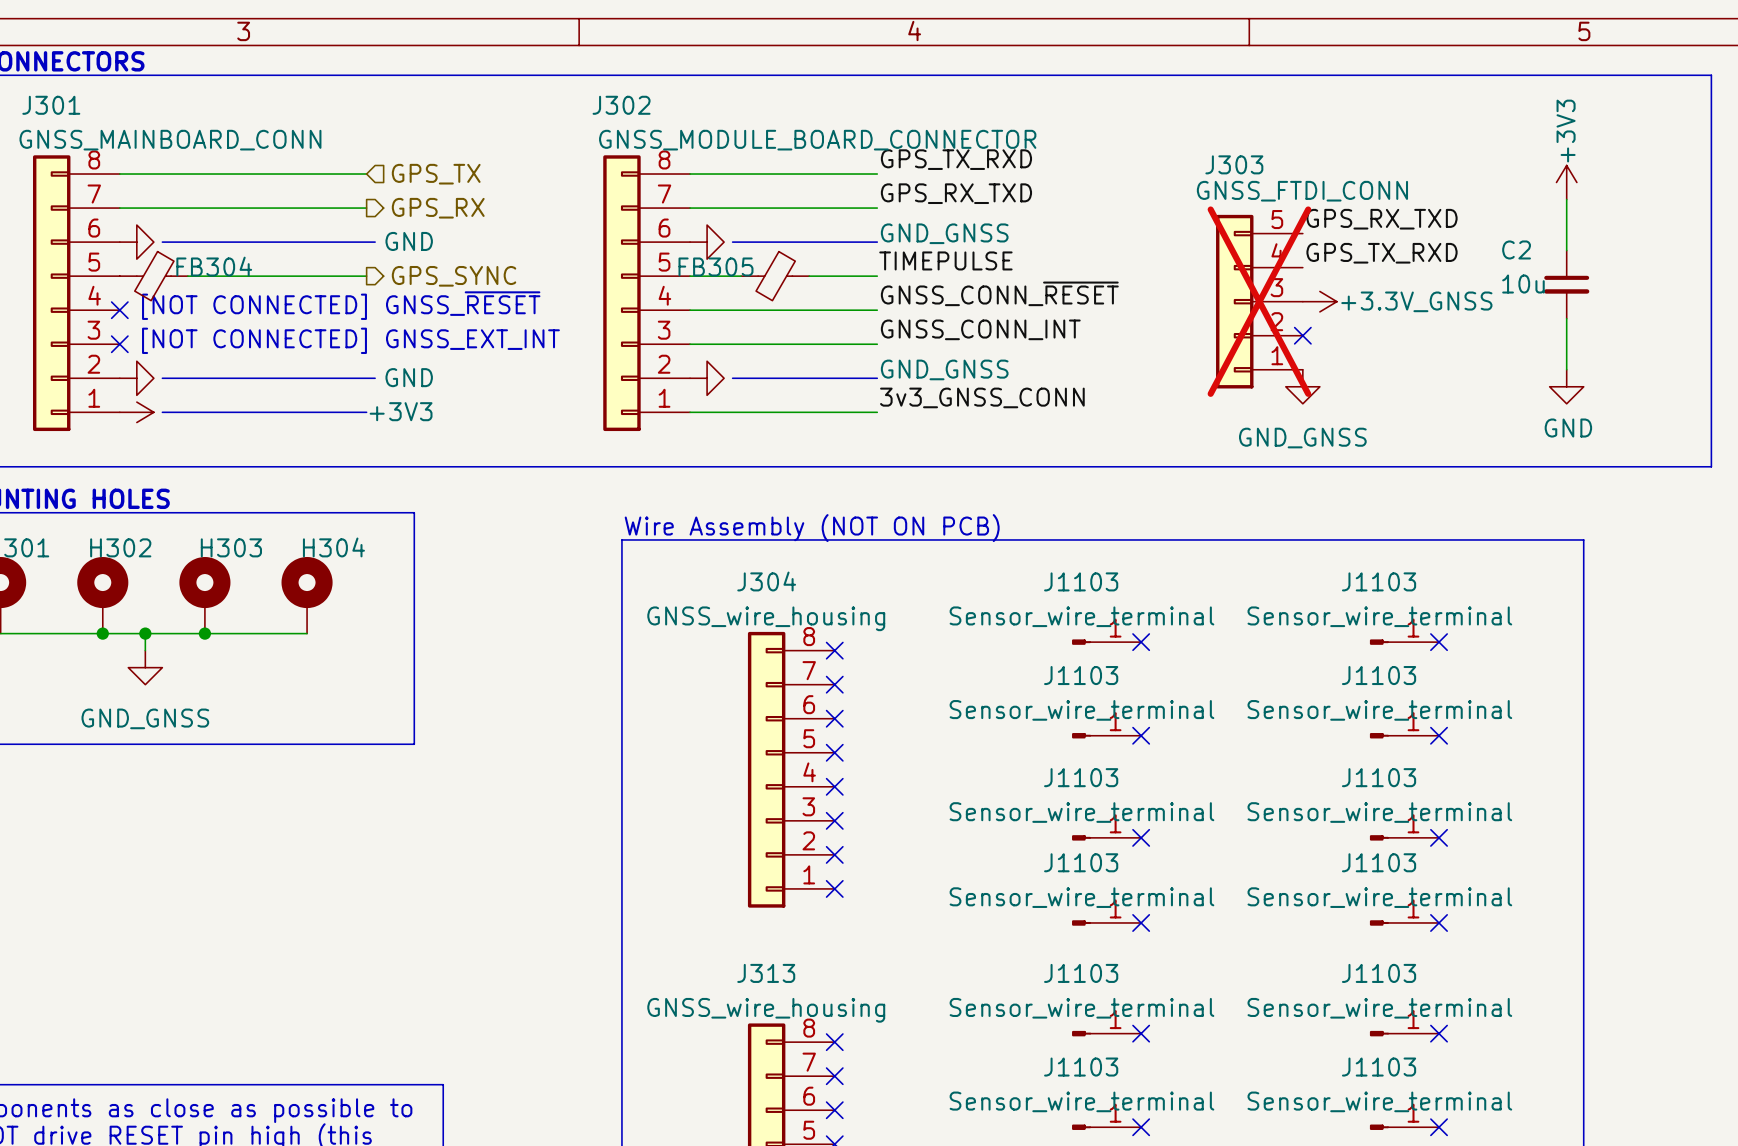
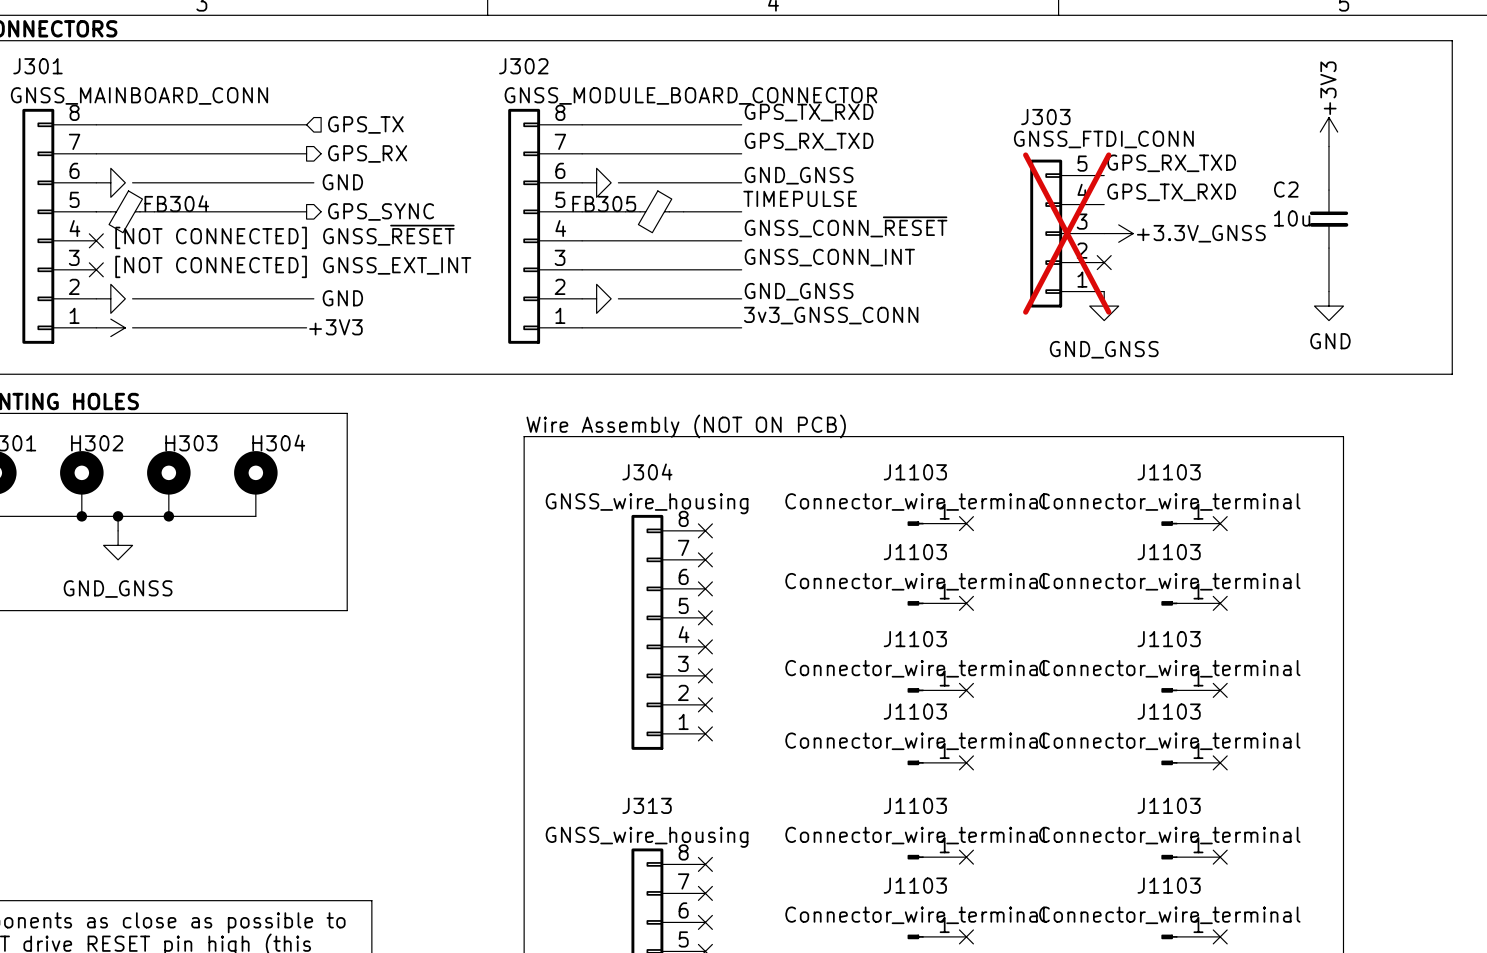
J1103 value: Sensor_wire_terminal (1081, 616) -> Connector_wire_terminal (916, 502)
J1103 value: Sensor_wire_terminal (1379, 616) -> Connector_wire_terminal (1169, 502)
J1103 value: Sensor_wire_terminal (1081, 710) -> Connector_wire_terminal (916, 581)
J1103 value: Sensor_wire_terminal (1379, 710) -> Connector_wire_terminal (1169, 581)
J1103 value: Sensor_wire_terminal (1081, 812) -> Connector_wire_terminal (916, 668)
J1103 value: Sensor_wire_terminal (1379, 812) -> Connector_wire_terminal (1169, 668)
J1103 value: Sensor_wire_terminal (1081, 897) -> Connector_wire_terminal (916, 741)
J1103 value: Sensor_wire_terminal (1379, 897) -> Connector_wire_terminal (1169, 741)
J1103 value: Sensor_wire_terminal (1081, 1008) -> Connector_wire_terminal (916, 835)
J1103 value: Sensor_wire_terminal (1379, 1008) -> Connector_wire_terminal (1169, 835)
J1103 value: Sensor_wire_terminal (1081, 1101) -> Connector_wire_terminal (916, 915)
J1103 value: Sensor_wire_terminal (1379, 1101) -> Connector_wire_terminal (1169, 915)

